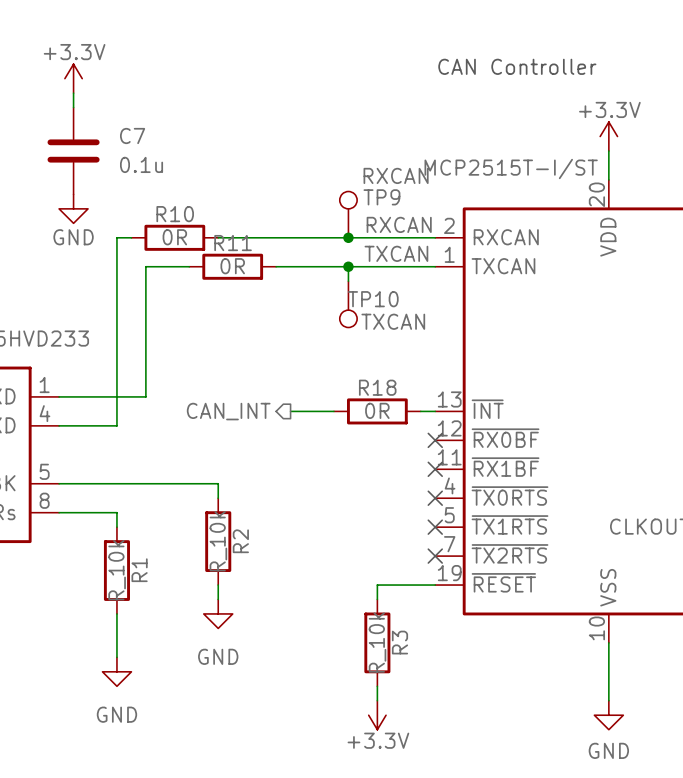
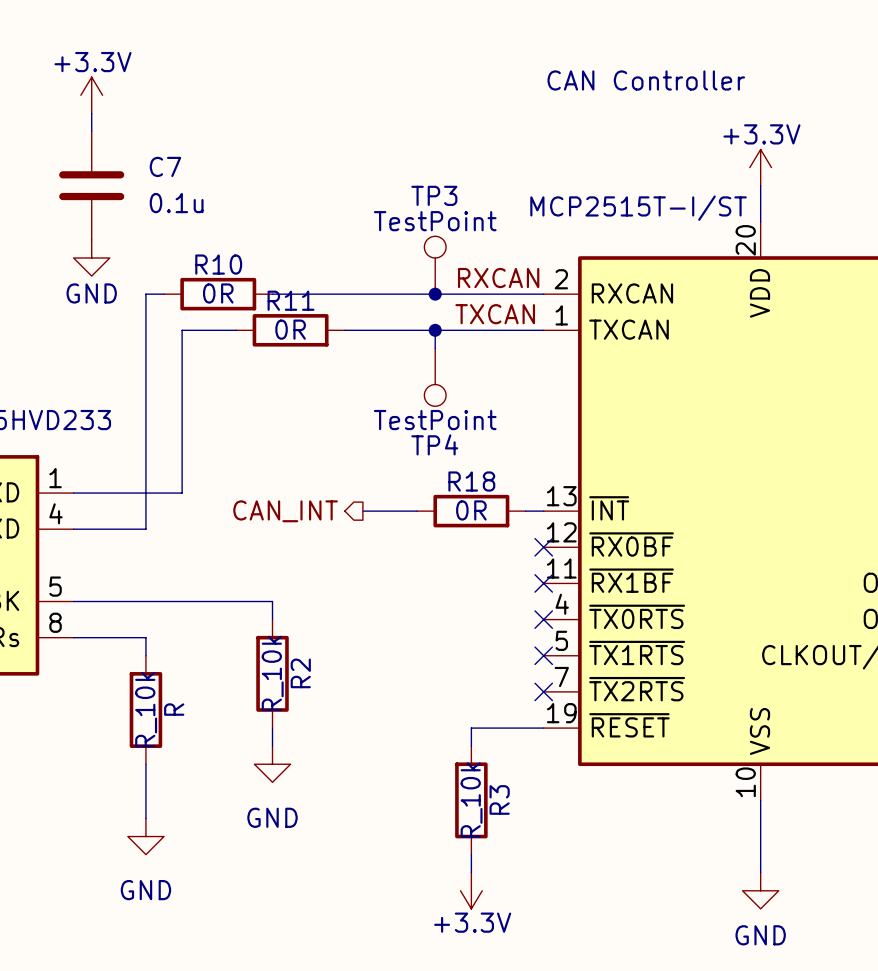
TP9 value: RXCAN (396, 175) -> TestPoint (435, 221)
TP9 name: TP9 (381, 197) -> TP3 (434, 195)
TP10 name: TP10 (373, 299) -> TP4 (434, 444)
TP10 value: TXCAN (393, 321) -> TestPoint (435, 420)
R1 name: R1 (139, 570) -> R (174, 709)

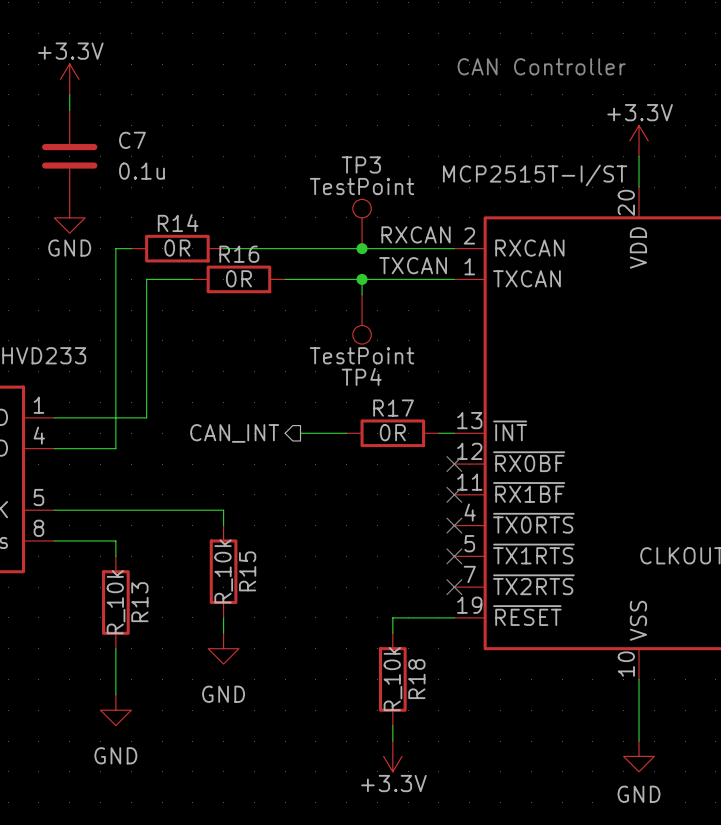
R10 name: R10 (218, 264) -> R14 (178, 223)
R11 name: R11 (291, 300) -> R16 (239, 254)
R18 name: R18 (471, 481) -> R17 (393, 408)
R2 name: R2 (300, 673) -> R15 (247, 571)
R name: R (174, 709) -> R13 (139, 602)
R3 name: R3 (499, 799) -> R18 (416, 679)

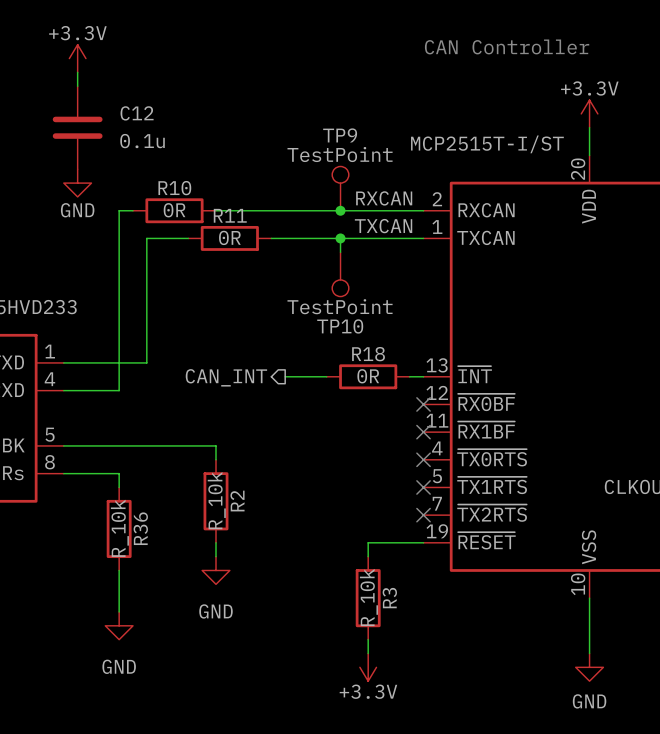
C7 name: C7 (132, 140) -> C12 (137, 113)
TP3 name: TP3 (361, 164) -> TP9 (340, 135)
R14 name: R14 (178, 223) -> R10 (174, 188)
R16 name: R16 (239, 254) -> R11 (230, 215)
TP4 name: TP4 (361, 376) -> TP10 (340, 326)
R17 name: R17 (393, 408) -> R18 (368, 354)
R15 name: R15 (247, 571) -> R2 (237, 501)
R13 name: R13 (139, 602) -> R36 (140, 528)
R18 name: R18 (416, 679) -> R3 (389, 598)

